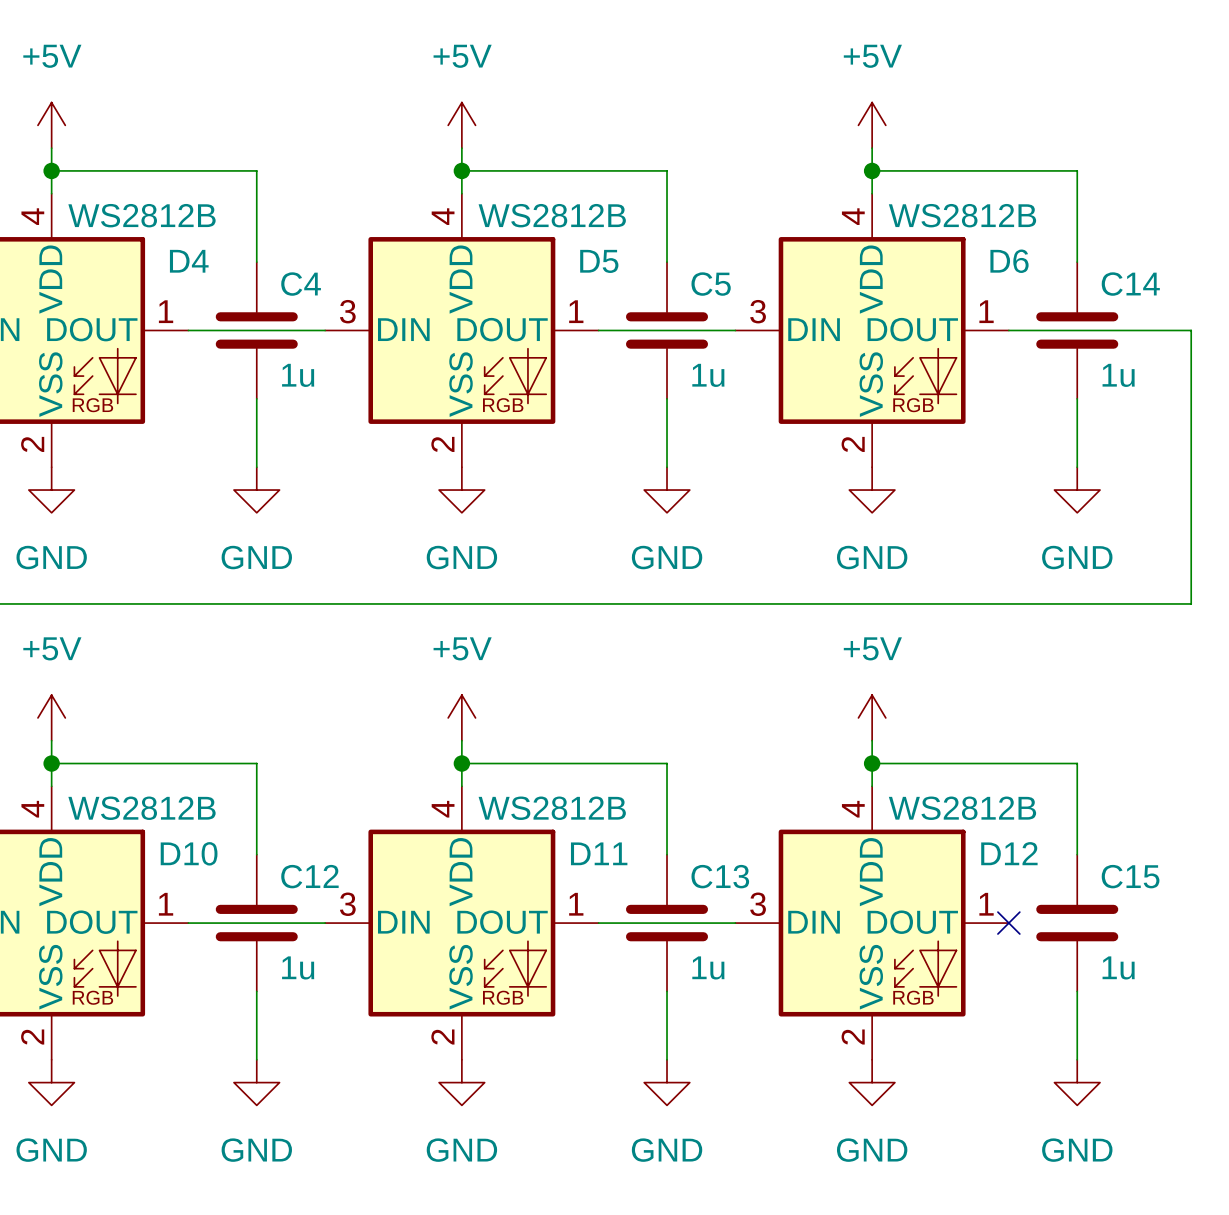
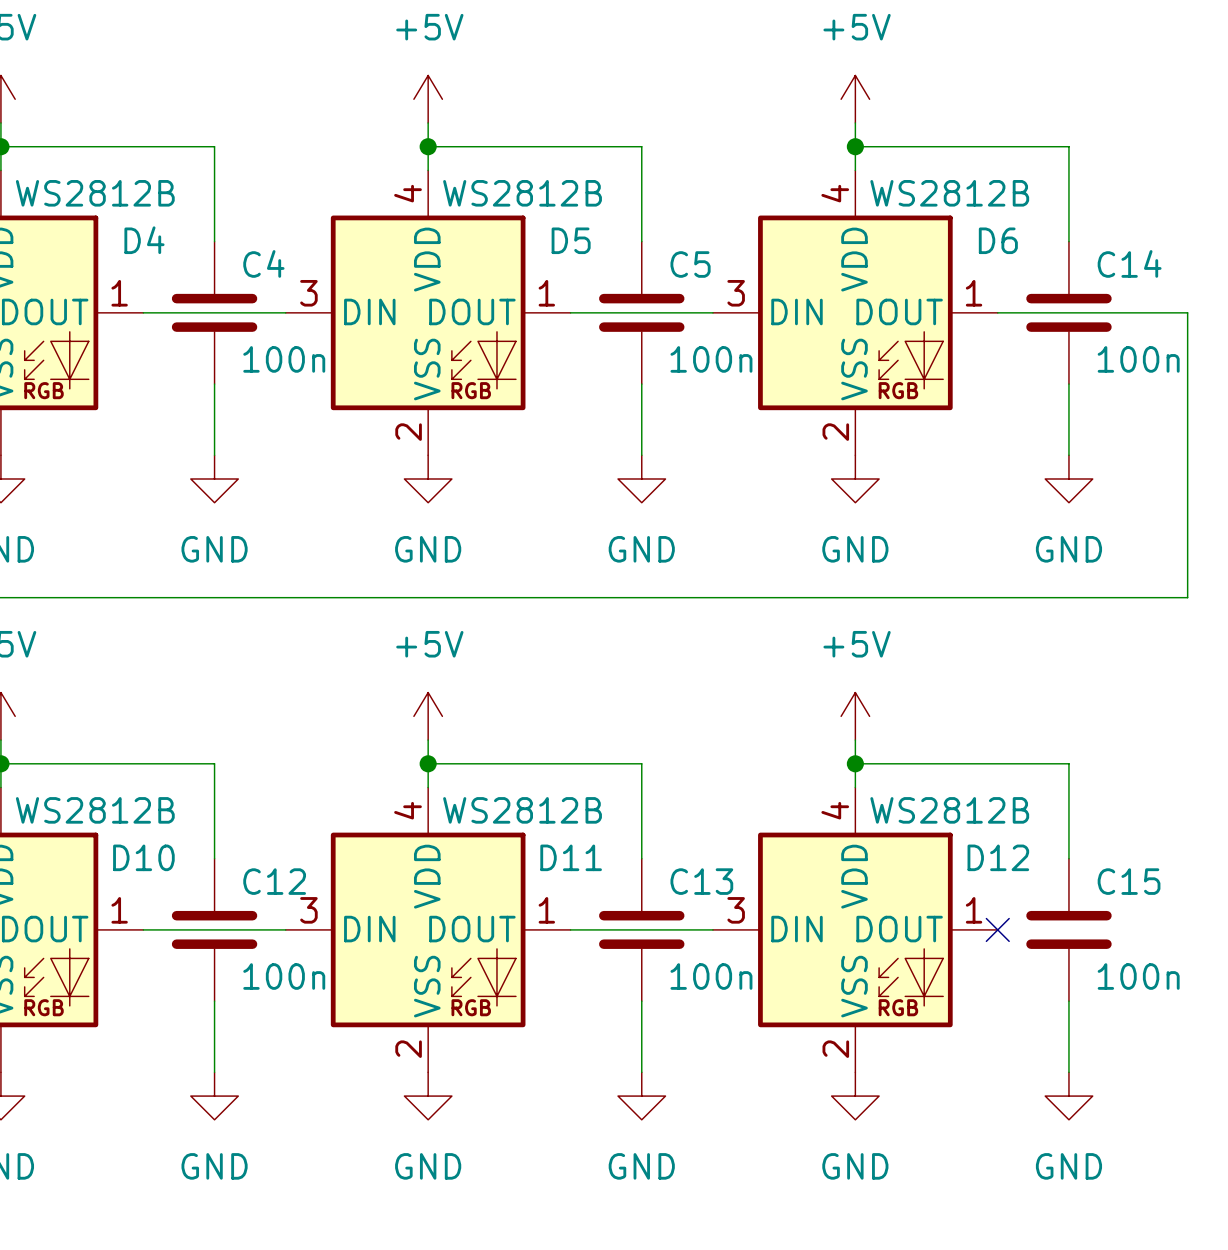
C4 value: 1u (298, 375) -> 100n (284, 359)
C5 value: 1u (708, 375) -> 100n (711, 359)
C14 value: 1u (1118, 375) -> 100n (1138, 359)
C12 value: 1u (298, 967) -> 100n (284, 976)
C13 value: 1u (708, 967) -> 100n (711, 976)
C15 value: 1u (1118, 967) -> 100n (1138, 976)

